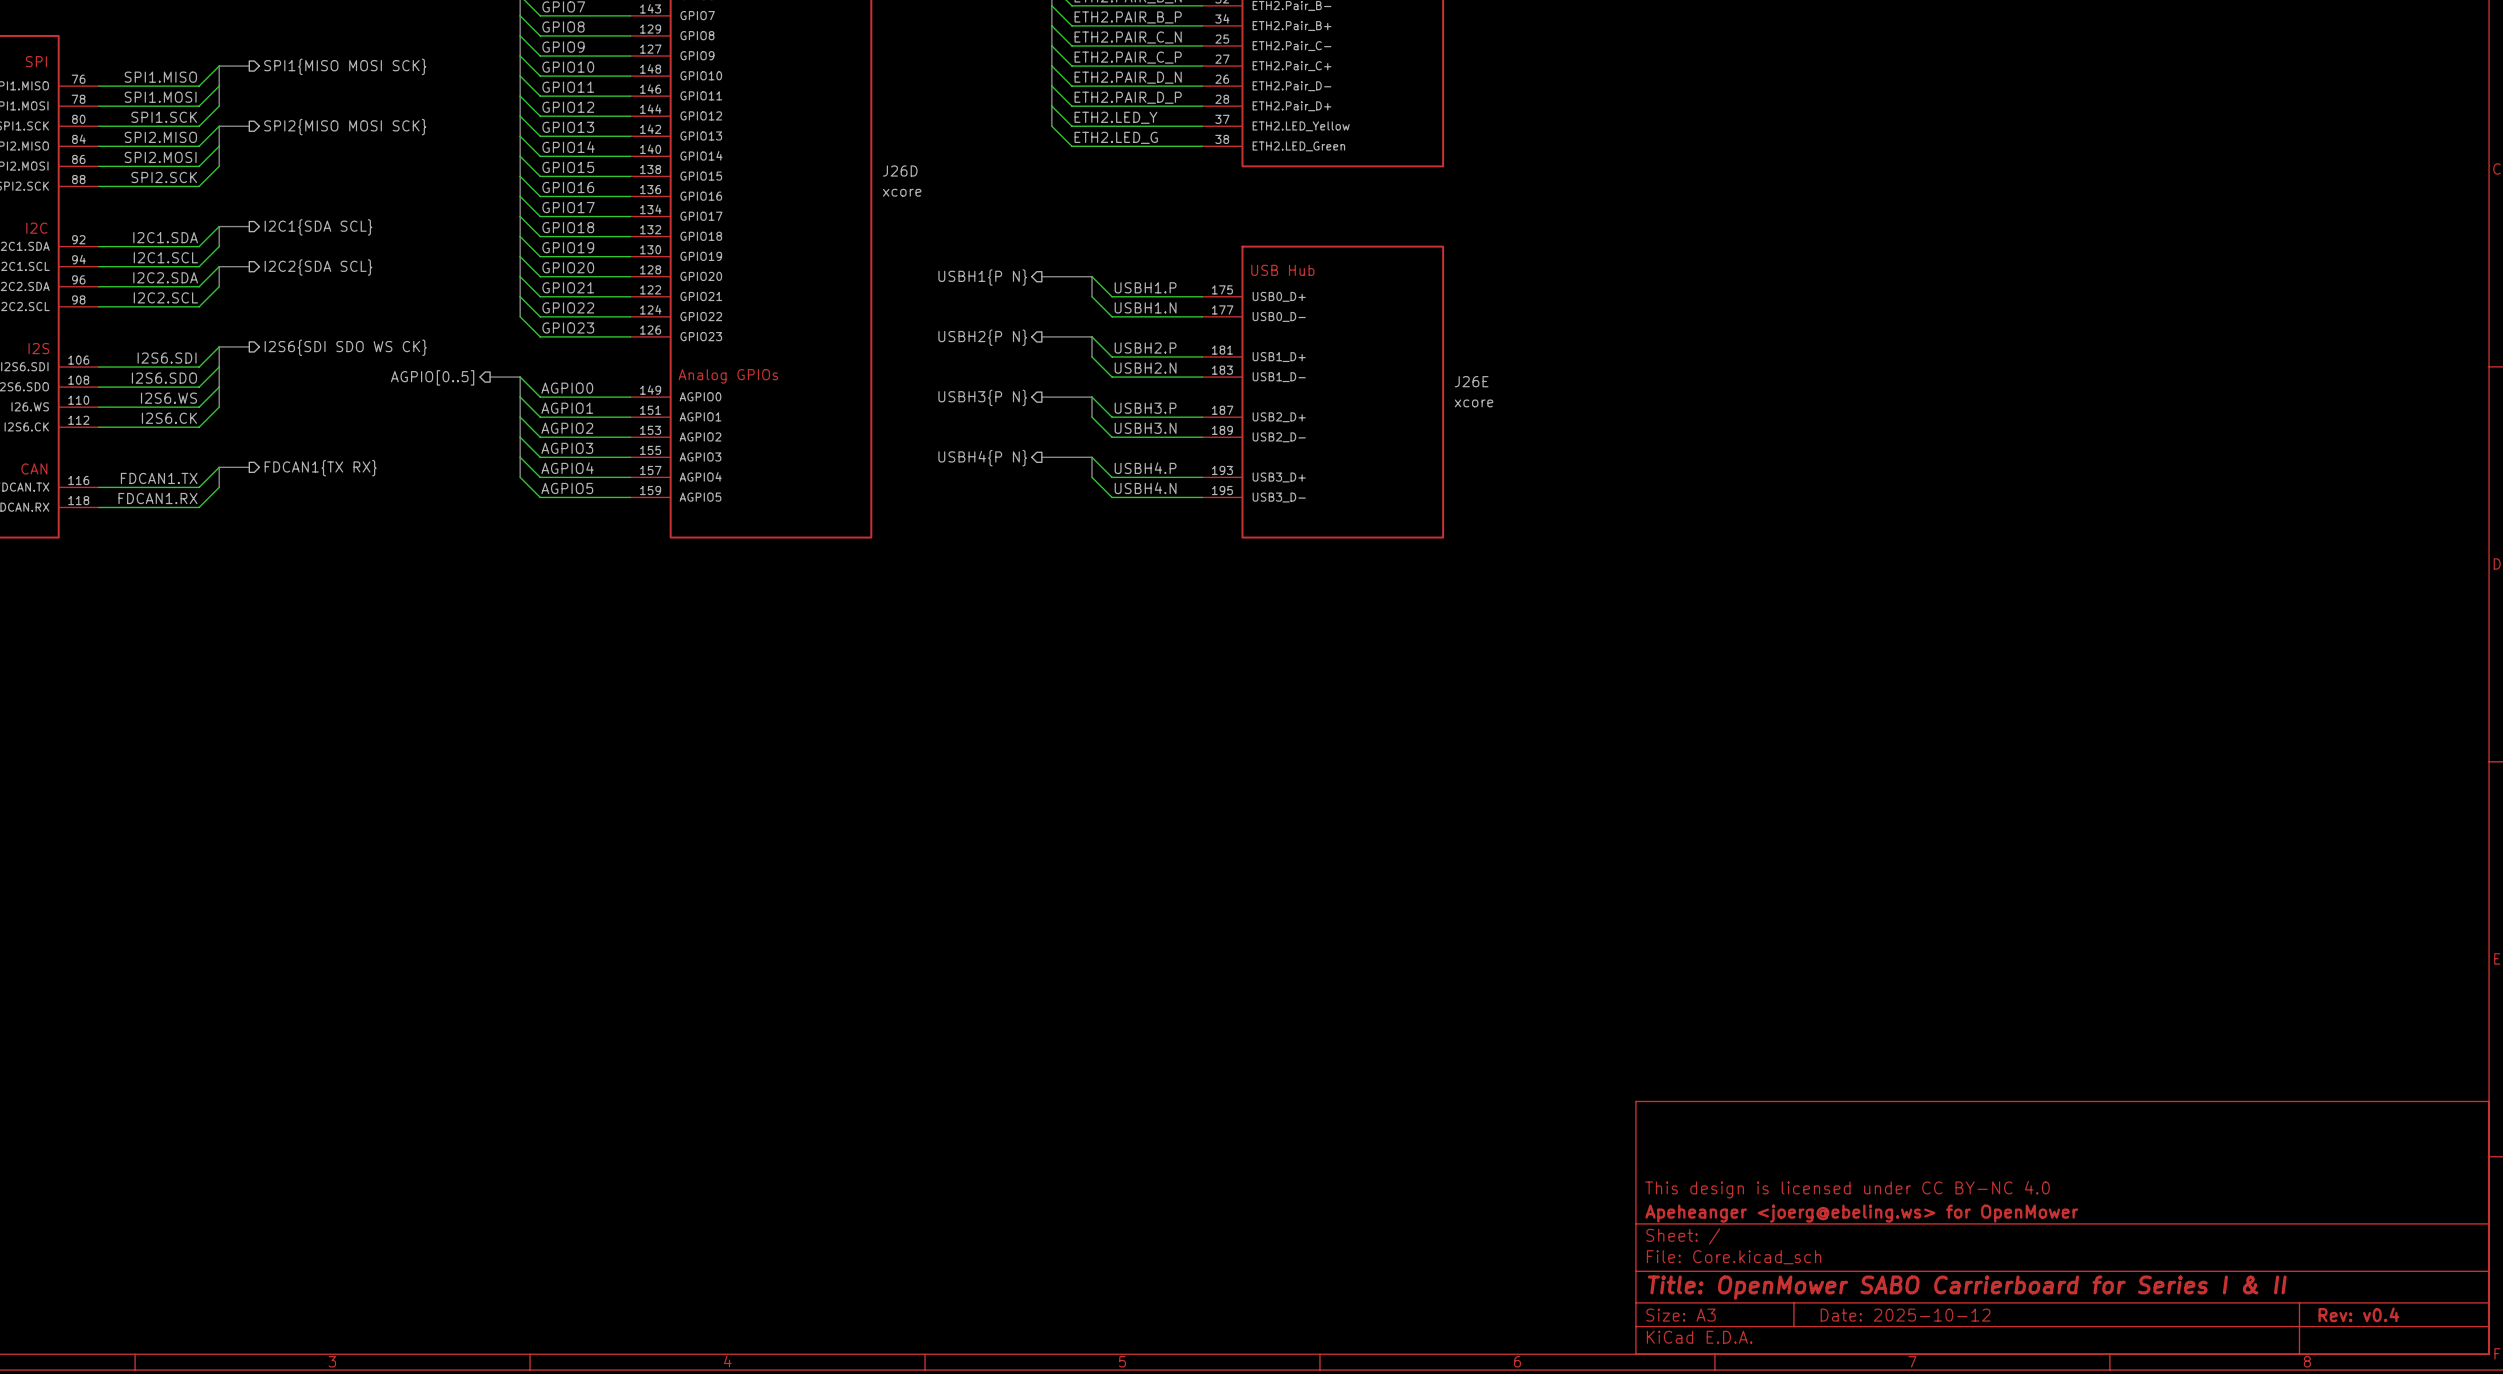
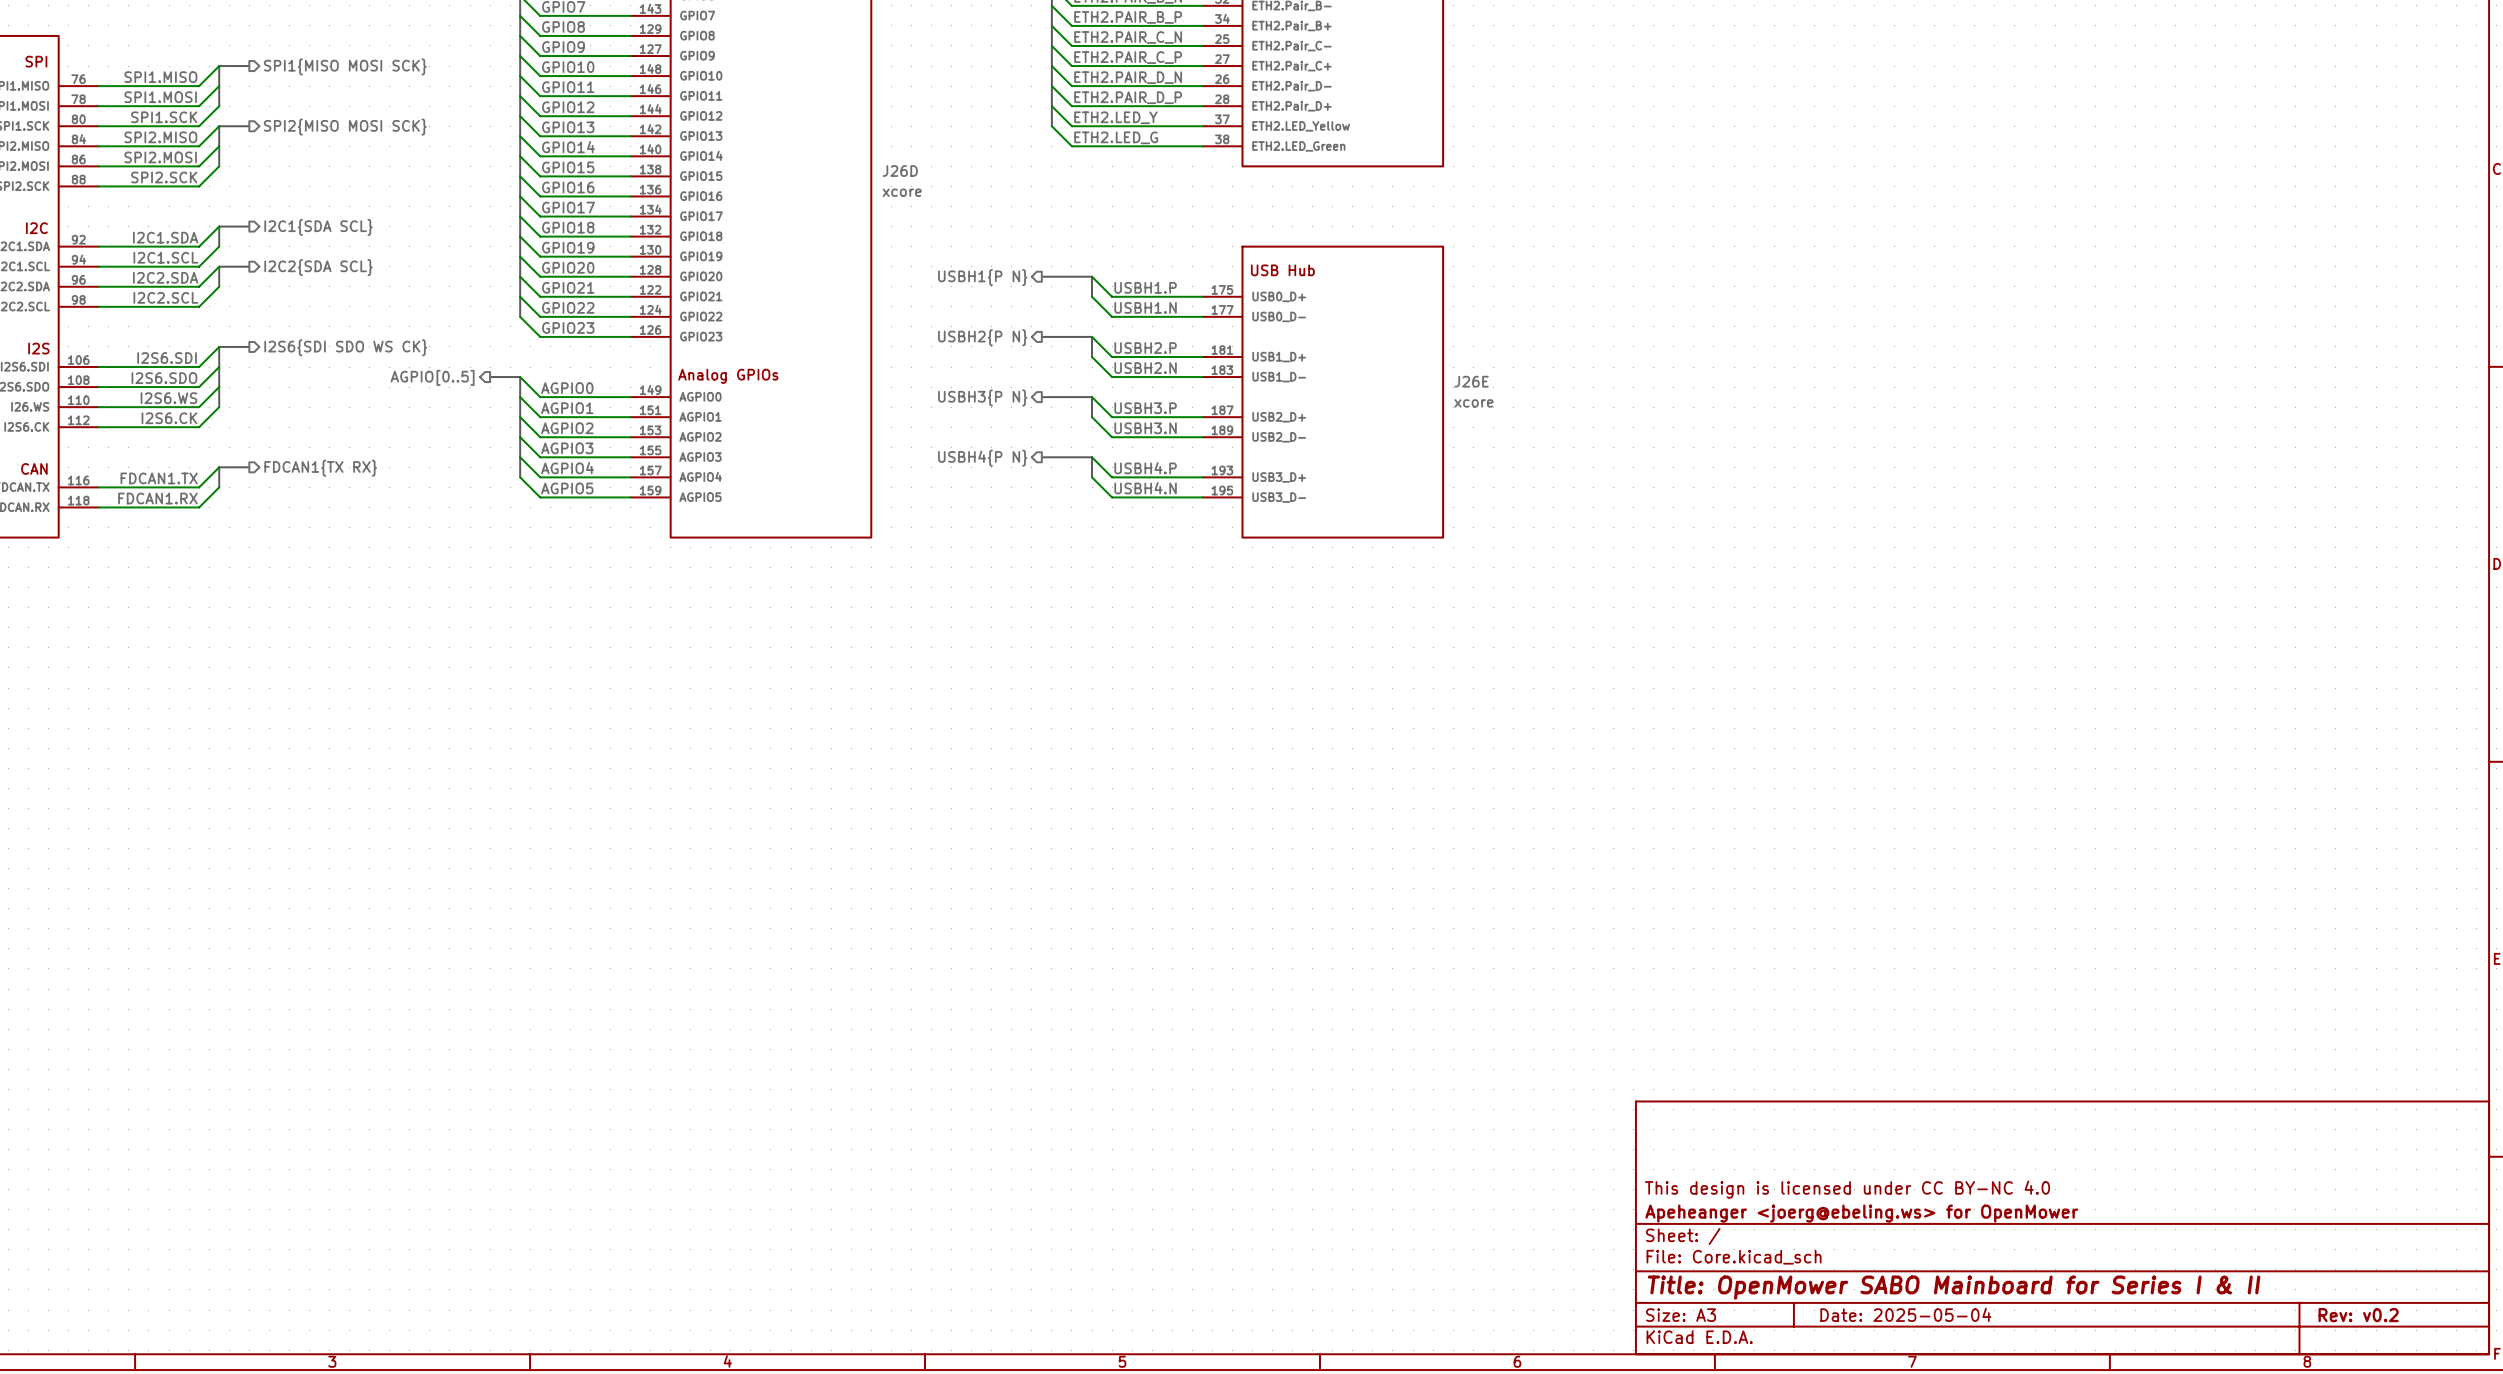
title block: Title: OpenMower SABO Carrierboard for Series I & II (1967, 1287) -> Title: OpenMower SABO Mainboard for Series I & II (1954, 1287)
title block: Rev: v0.4 (2358, 1314) -> Rev: v0.2 (2358, 1315)
title block: Date: 2025-10-12 (1905, 1315) -> Date: 2025-05-04 (1905, 1314)

